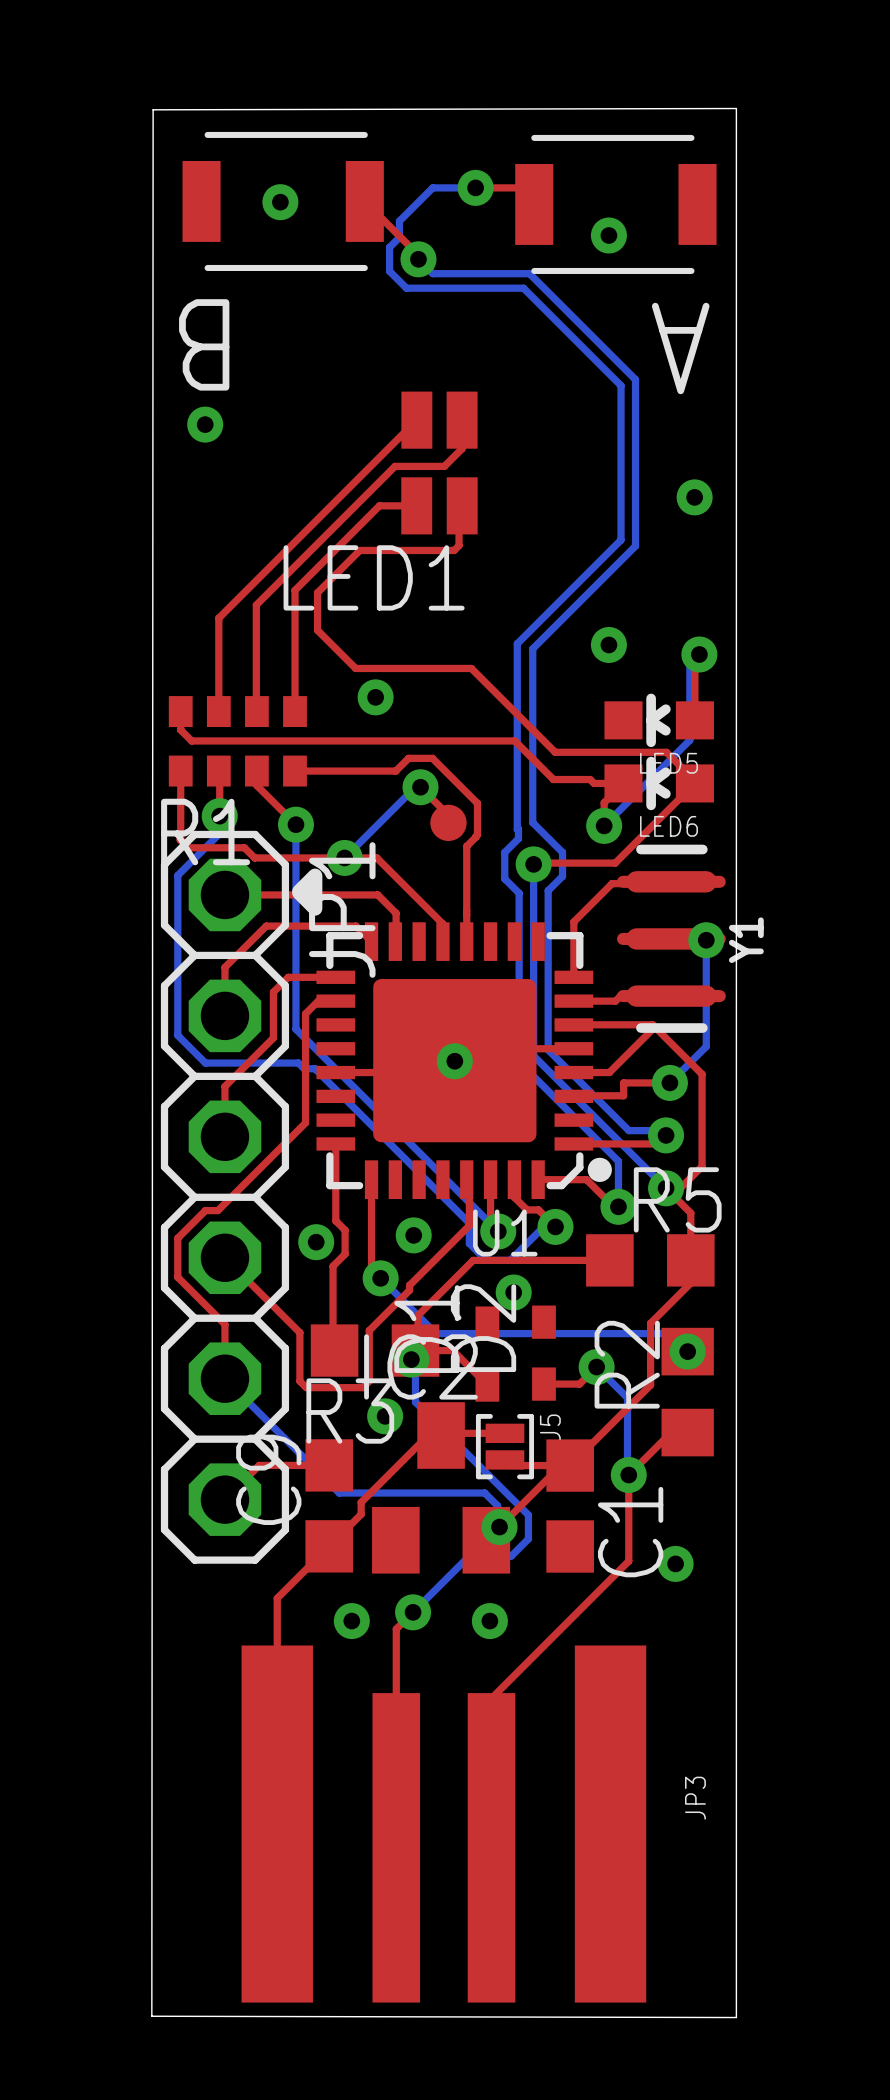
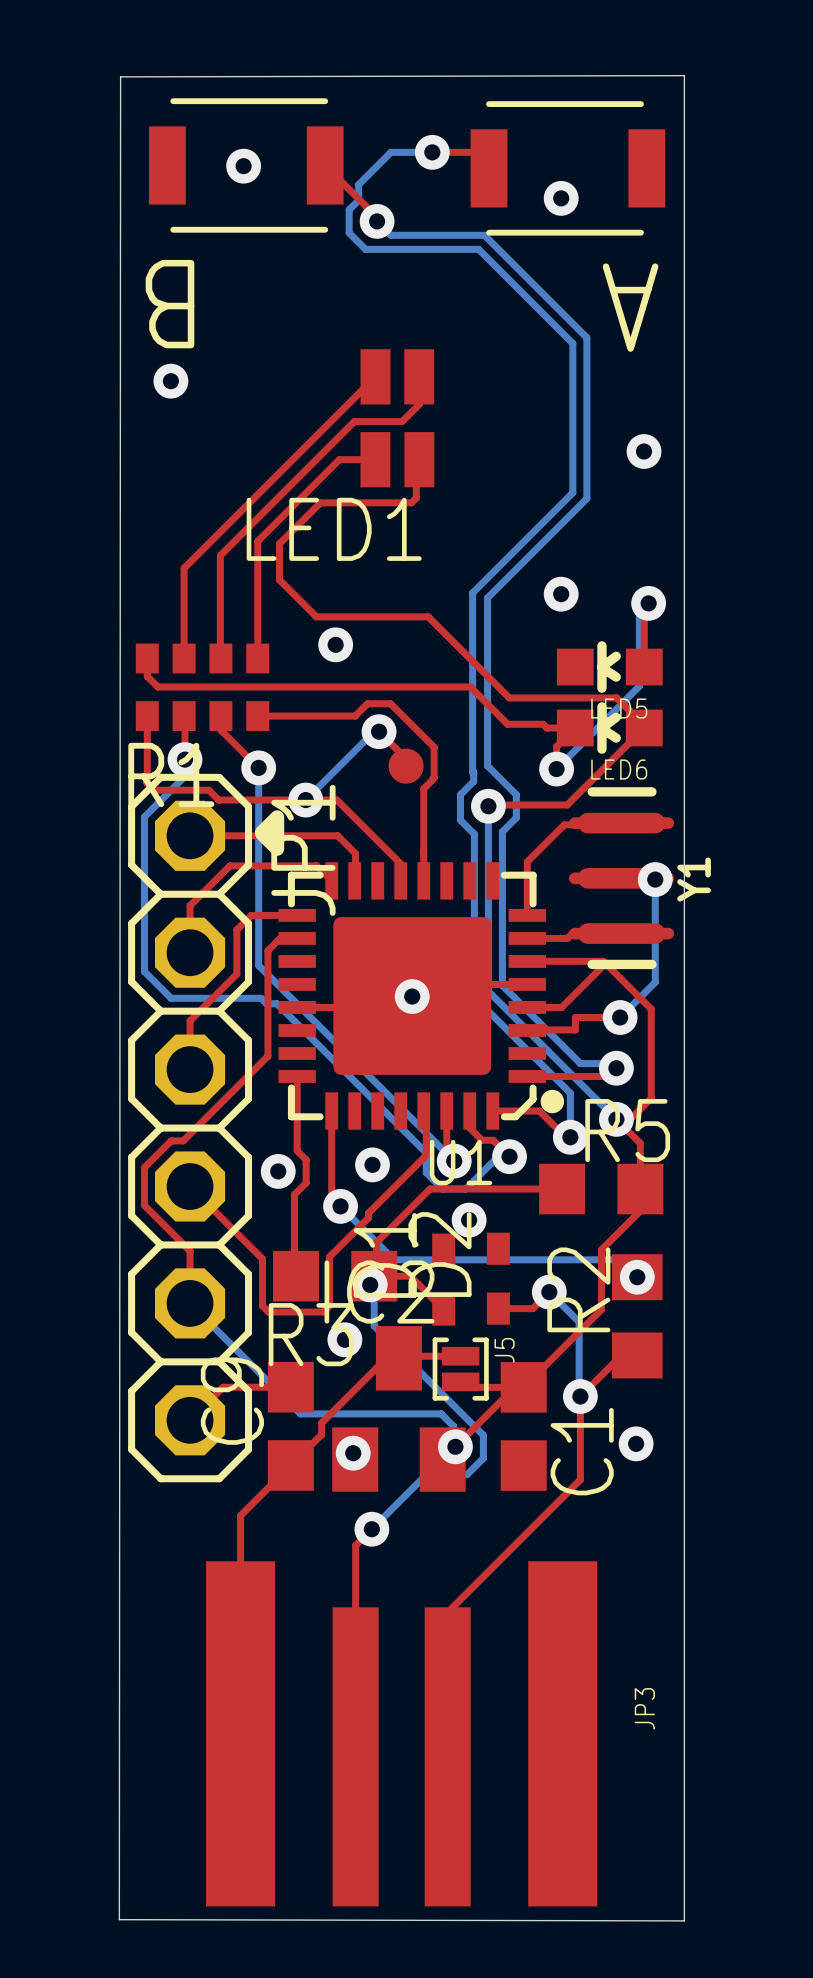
via: none -> (353, 1453)
via position: (675, 1563) -> (636, 1443)
via: (351, 1621) -> none
via: (489, 1621) -> none

